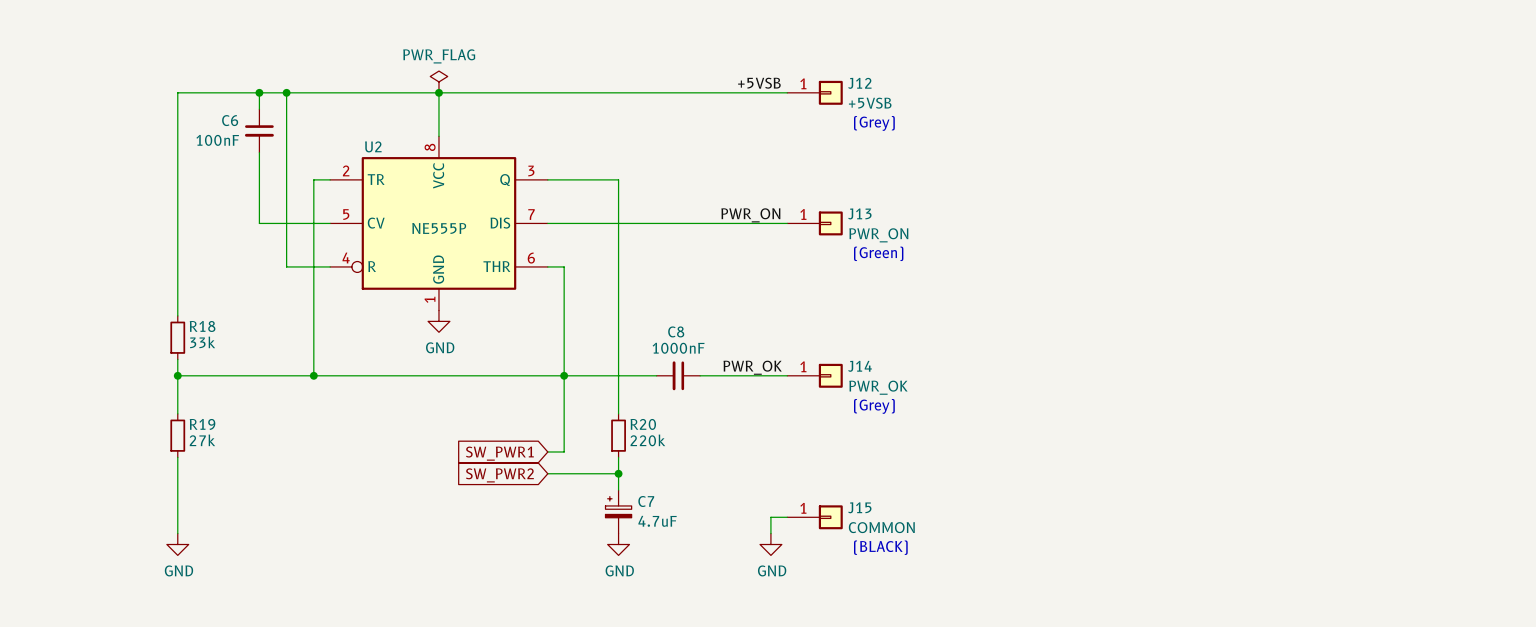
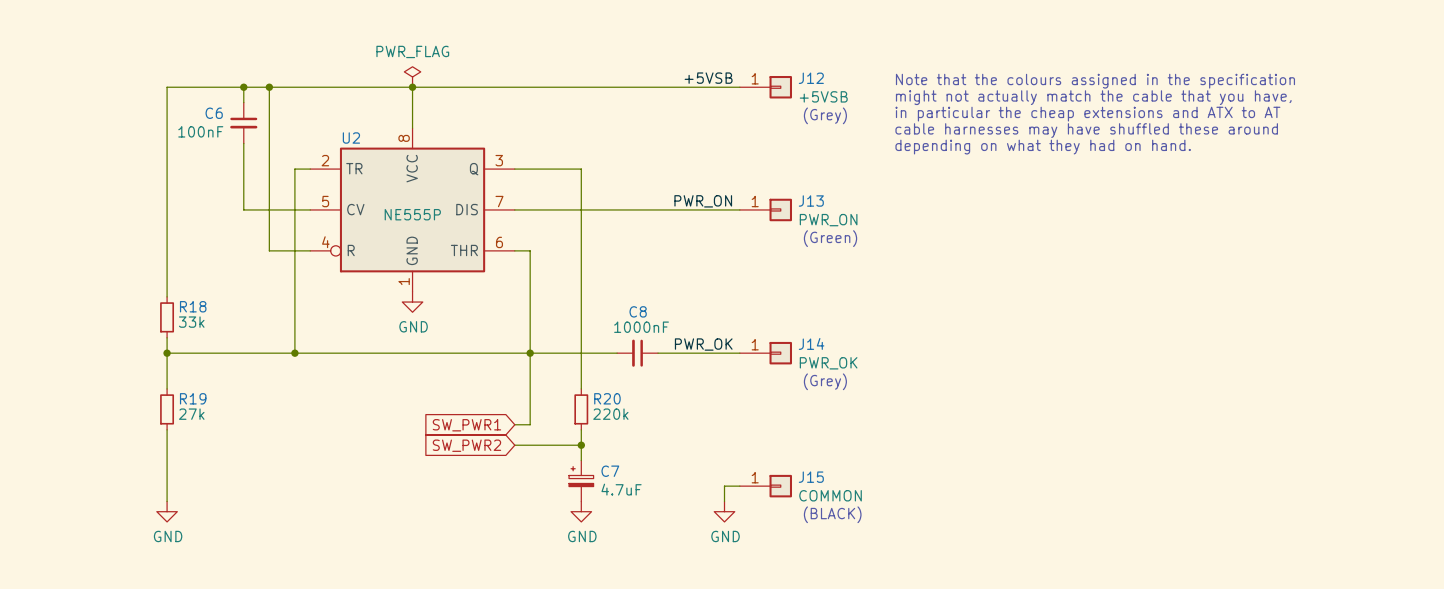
text: none -> Note that the colours assigned in the specification (1095, 81)
text: none -> might not actually match the cable that you have, (1093, 97)
text: none -> in particular the cheap extensions and ATX to AT (1087, 114)
text: none -> cable harnesses may have shuffled these around (1086, 130)
text: none -> depending on what they had on hand. (1043, 147)

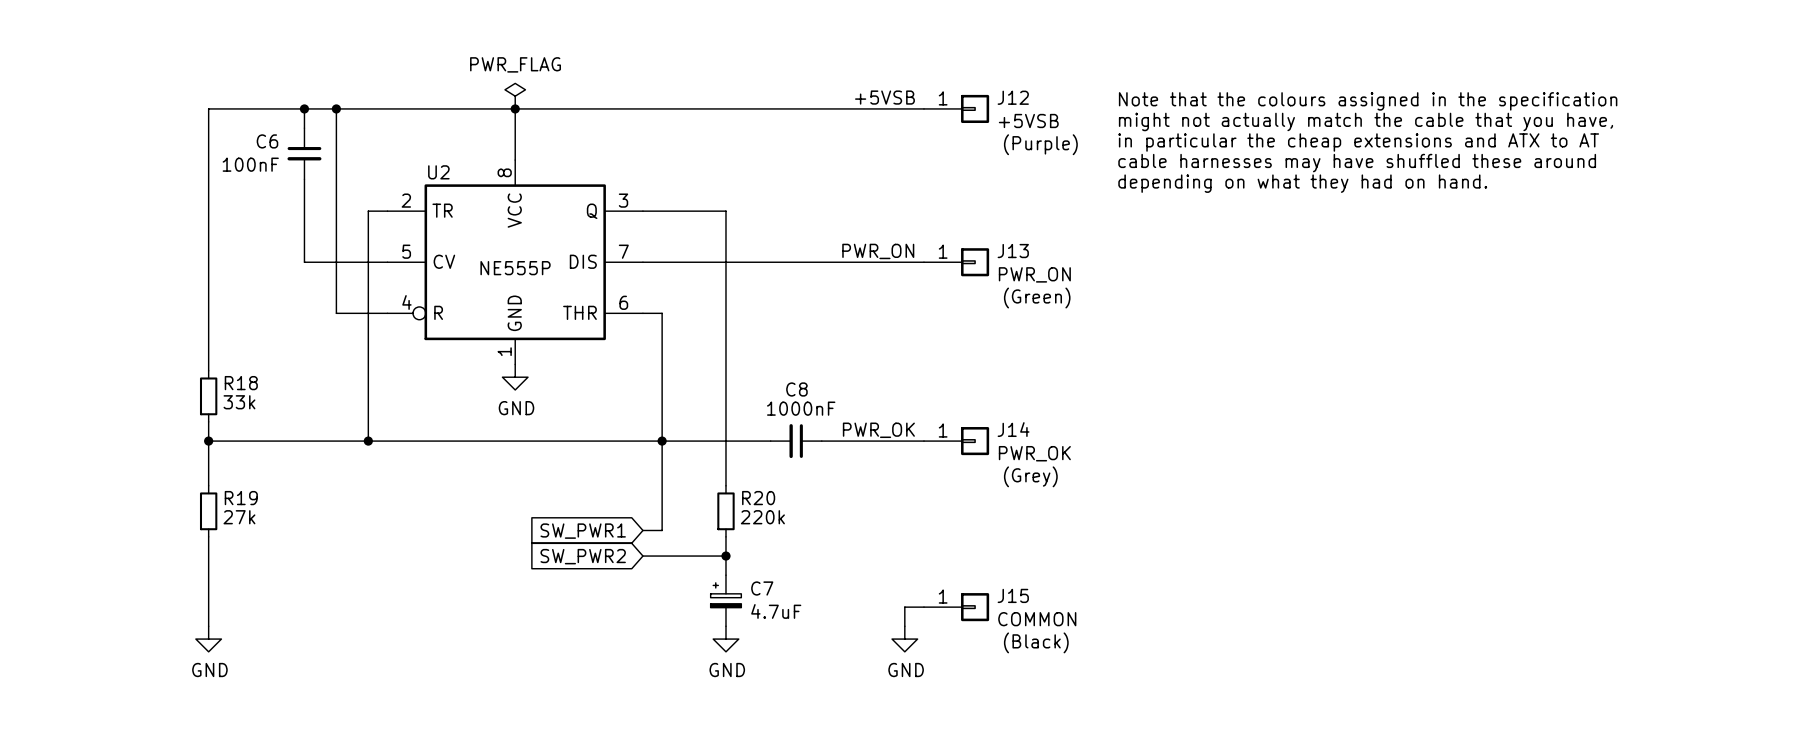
text: (Grey) (825, 115) -> (Purple) (1040, 144)
text: (BLACK) (832, 514) -> (Black) (1036, 642)

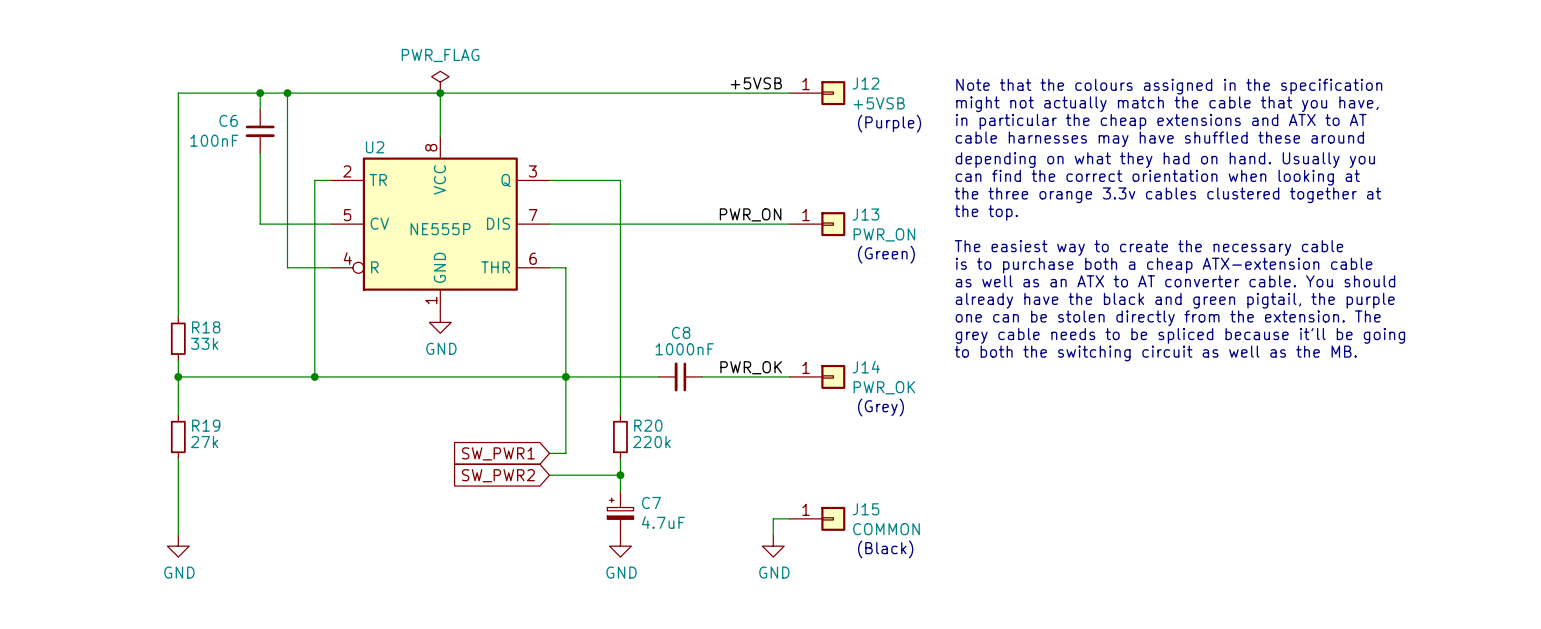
text: depending on what they had on hand. (1302, 183) -> depending on what they had on hand. Usually you (1165, 160)
text: none -> can find the correct orientation when looking at (1157, 177)
text: none -> the three orange 3.3v cables clustered together at (1167, 195)
text: none -> the top. (986, 212)
text: none -> The easiest way to create the necessary cable (1148, 247)
text: none -> is to purchase both a cheap ATX-extension cable (1164, 265)
text: none -> as well as an ATX to AT converter cable. You should (1175, 281)
text: none -> already have the black and green pigtail, the purple (1175, 300)
text: none -> one can be stolen directly from the extension. The (1168, 318)
text: none -> grey cable needs to be spliced because it'll be going (1180, 335)
text: none -> to both the switching circuit as well as the MB. (1155, 353)

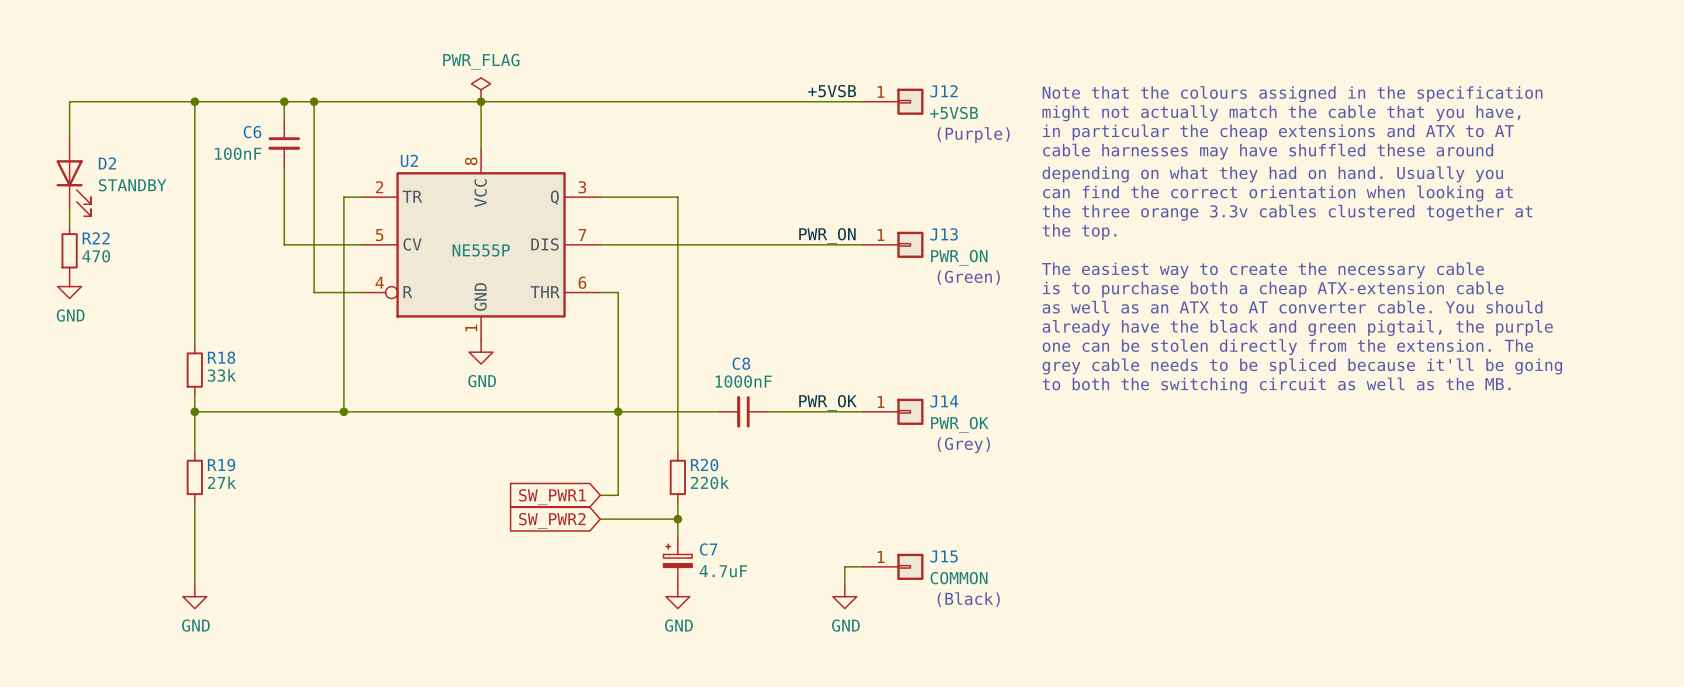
wire: none -> (194, 101) (69, 101) (69, 137)
junction: none -> (194, 101)
D2: none -> STANDBY (73, 176)
wire: none -> (69, 209) (69, 226)
R22: none -> 470 (69, 250)
power symbol: none -> GND (69, 286)

